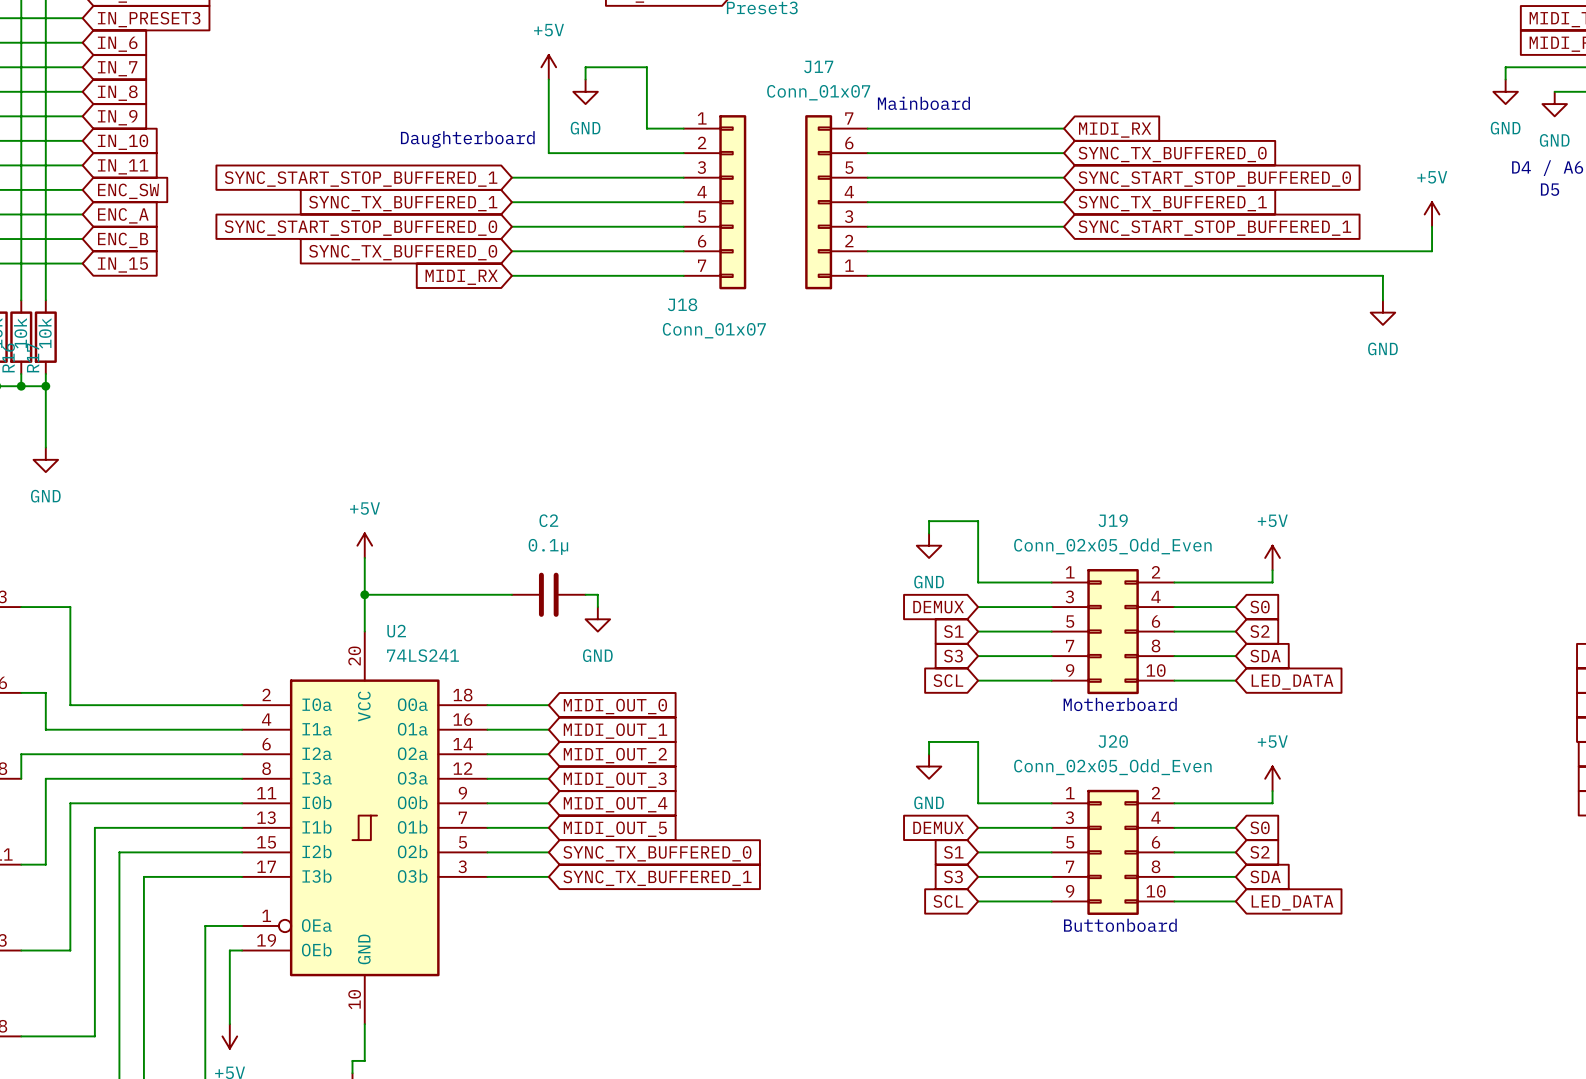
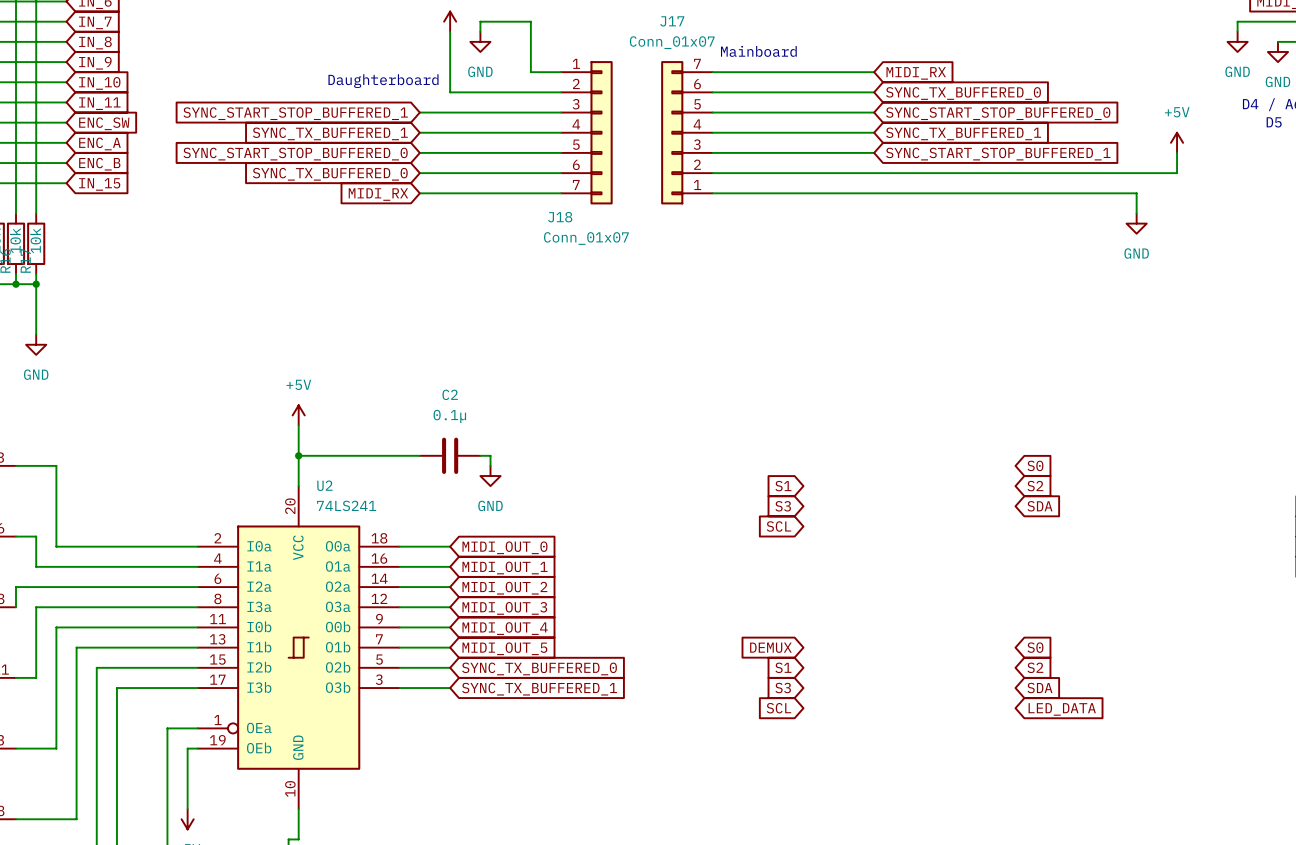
wire: (929, 533) (929, 521) (978, 521) (978, 582) (1051, 582) -> none
power symbol: GND (929, 545) -> none
power symbol: +5V (1272, 557) -> none
wire: (1272, 570) (1272, 582) (1174, 582) -> none
global label: DEMUX (938, 607) -> none
wire: (978, 607) (1051, 607) -> none
wire: (1174, 607) (1235, 607) -> none
wire: (978, 631) (1051, 631) -> none
J19: Conn_02x05_Odd_Even (1113, 631) -> none
wire: (1174, 631) (1235, 631) -> none
wire: (978, 656) (1051, 656) -> none
wire: (1174, 656) (1235, 656) -> none
wire: (978, 680) (1051, 680) -> none
wire: (1174, 680) (1235, 680) -> none
global label: LED_DATA (1292, 682) -> none
text: Motherboard (1120, 704) -> none
wire: (929, 754) (929, 741) (978, 741) (978, 803) (1051, 803) -> none
power symbol: GND (929, 766) -> none
power symbol: +5V (1272, 778) -> none
wire: (1272, 791) (1272, 803) (1174, 803) -> none
wire: (978, 827) (1051, 827) -> none
wire: (1174, 827) (1235, 827) -> none
wire: (978, 852) (1051, 852) -> none
J20: Conn_02x05_Odd_Even (1113, 852) -> none
wire: (1174, 852) (1235, 852) -> none
wire: (978, 876) (1051, 876) -> none
wire: (1174, 876) (1235, 876) -> none
wire: (978, 901) (1051, 901) -> none
wire: (1174, 901) (1235, 901) -> none
text: Buttonboard (1120, 925) -> none

